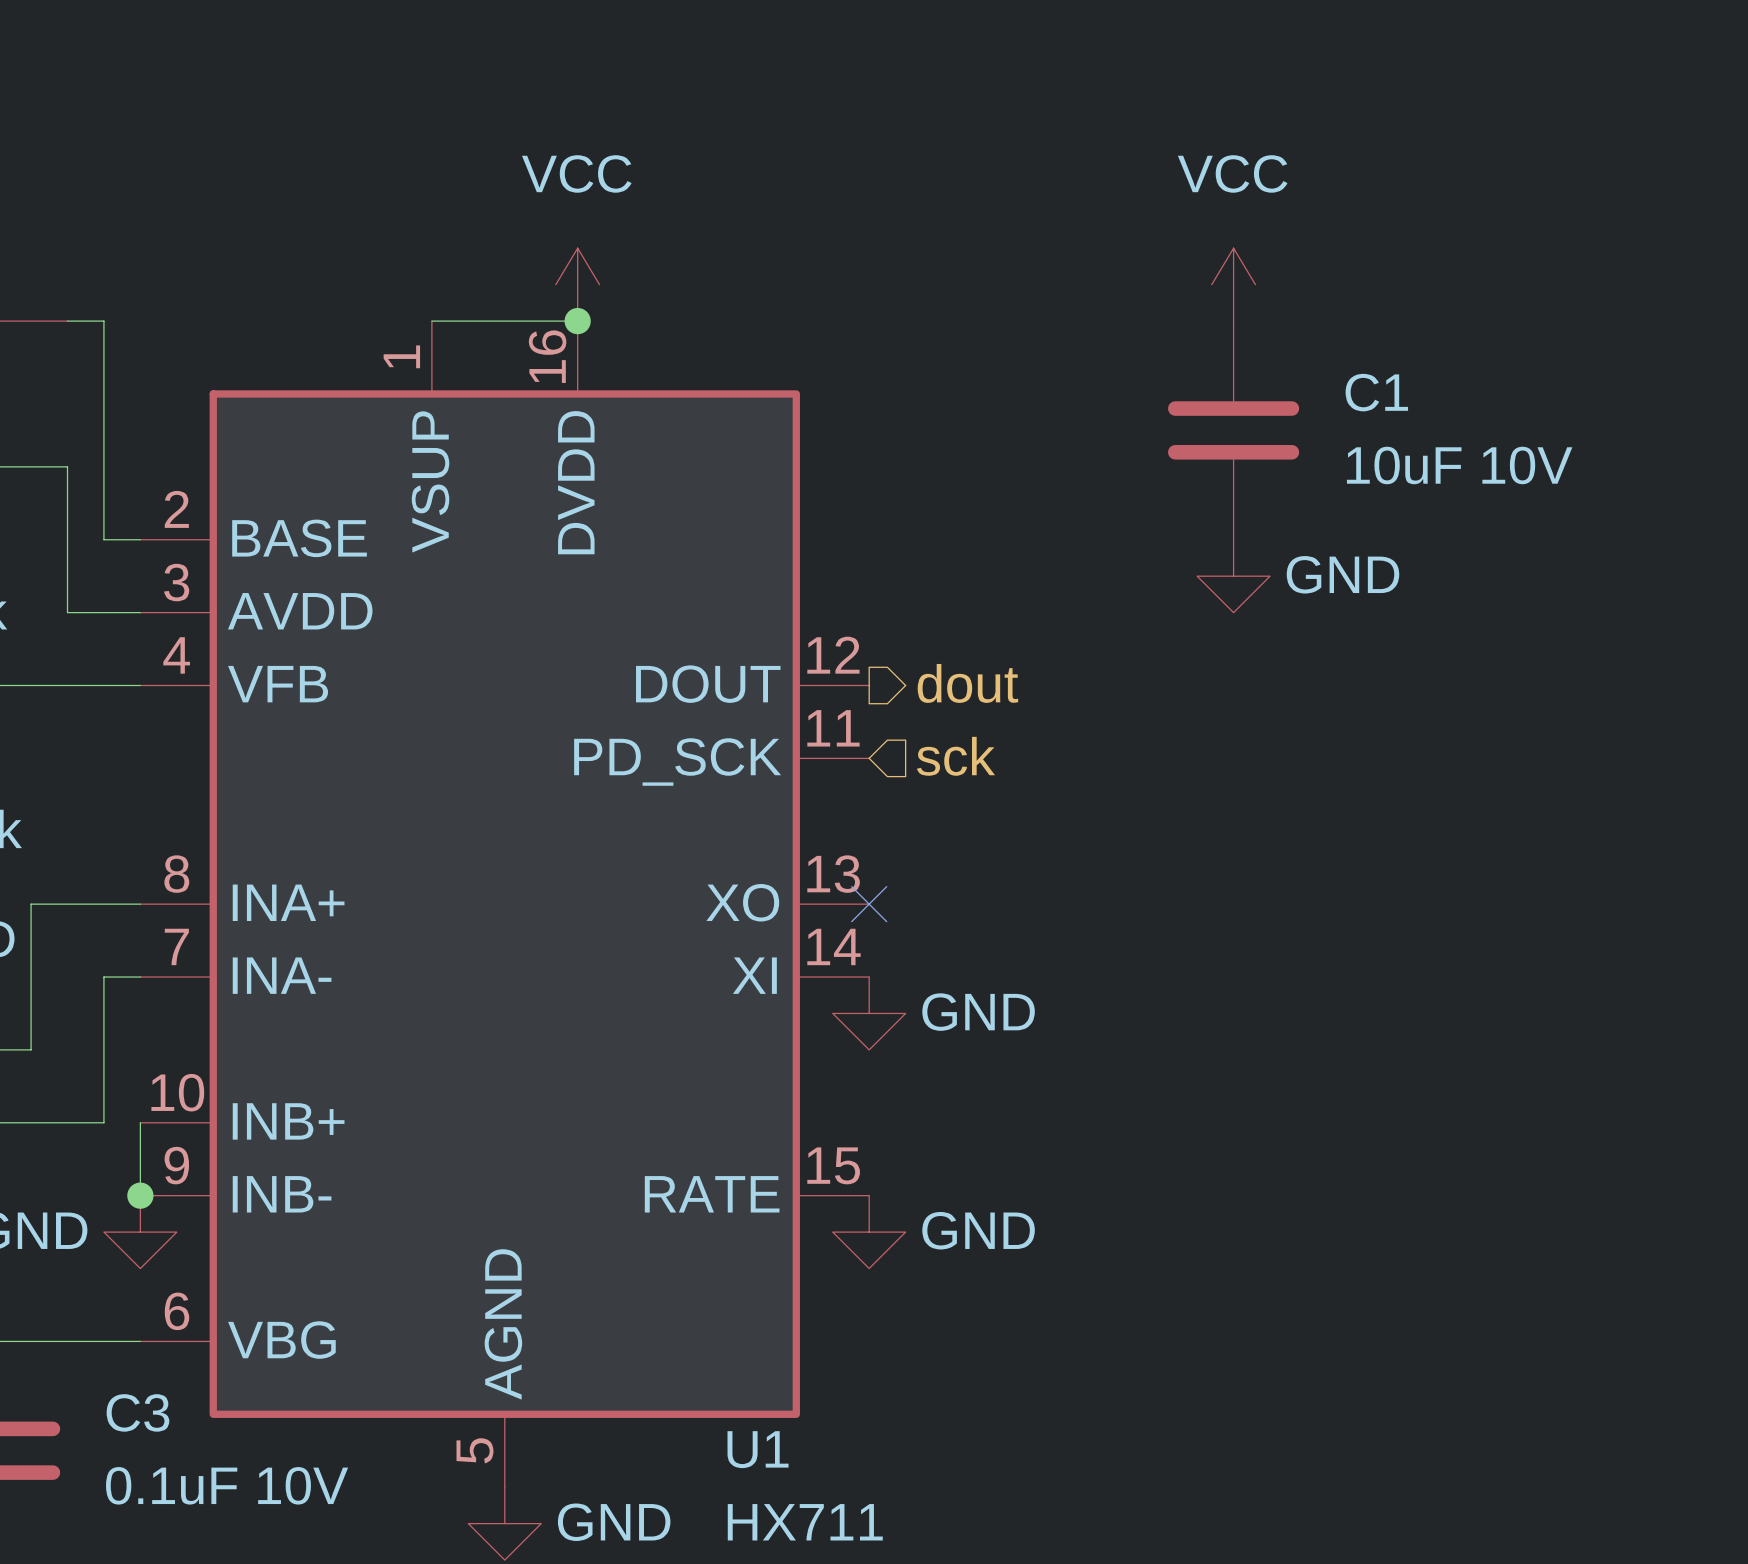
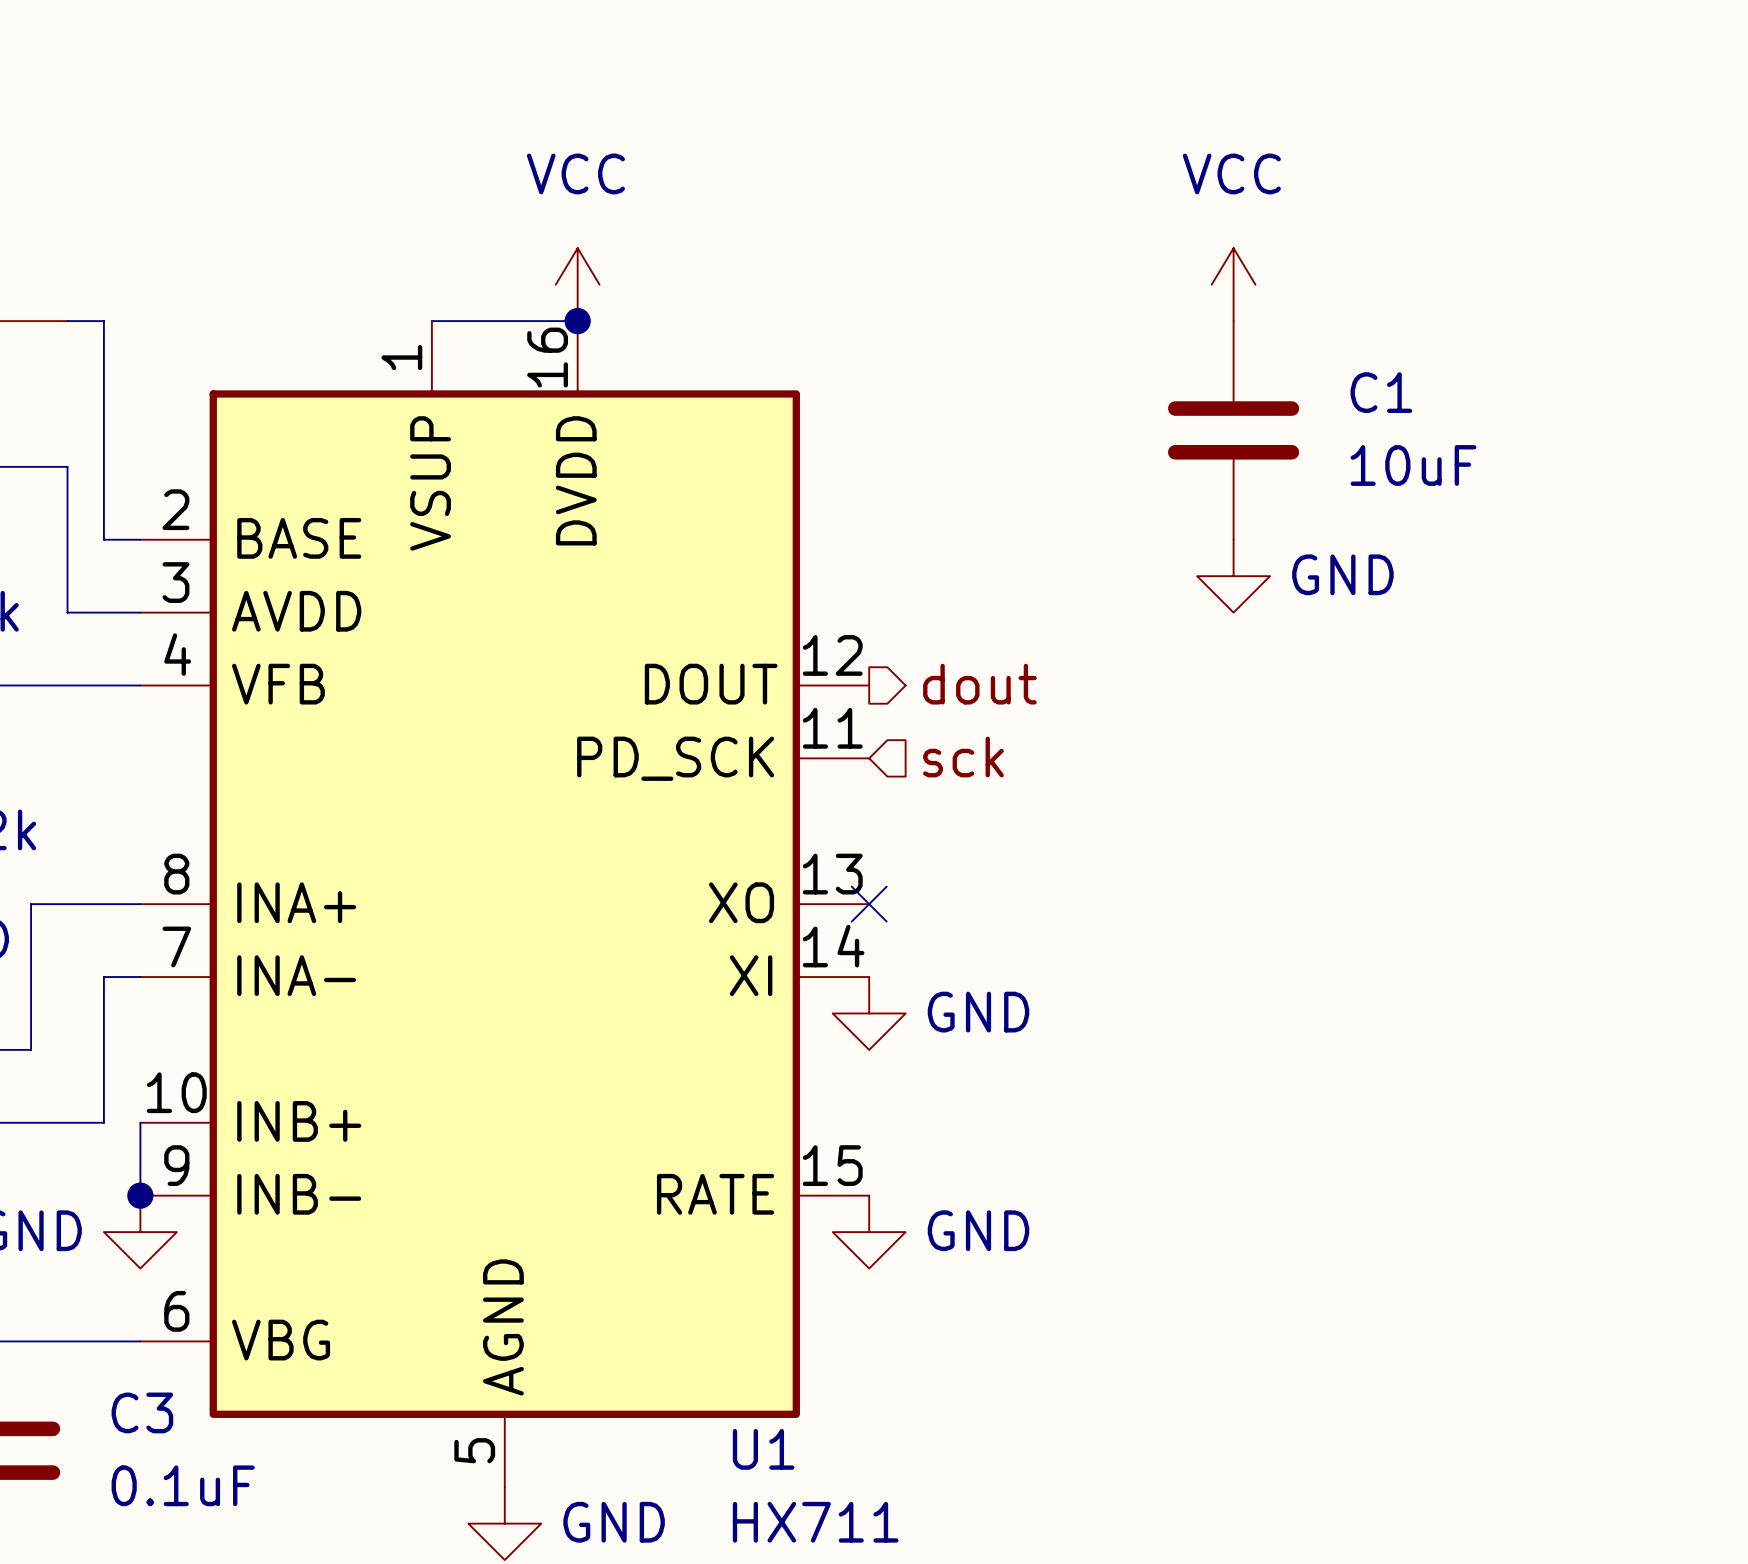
C1 value: 10uF 10V (1459, 465) -> 10uF (1413, 465)
C3 value: 0.1uF 10V (227, 1485) -> 0.1uF (183, 1485)

